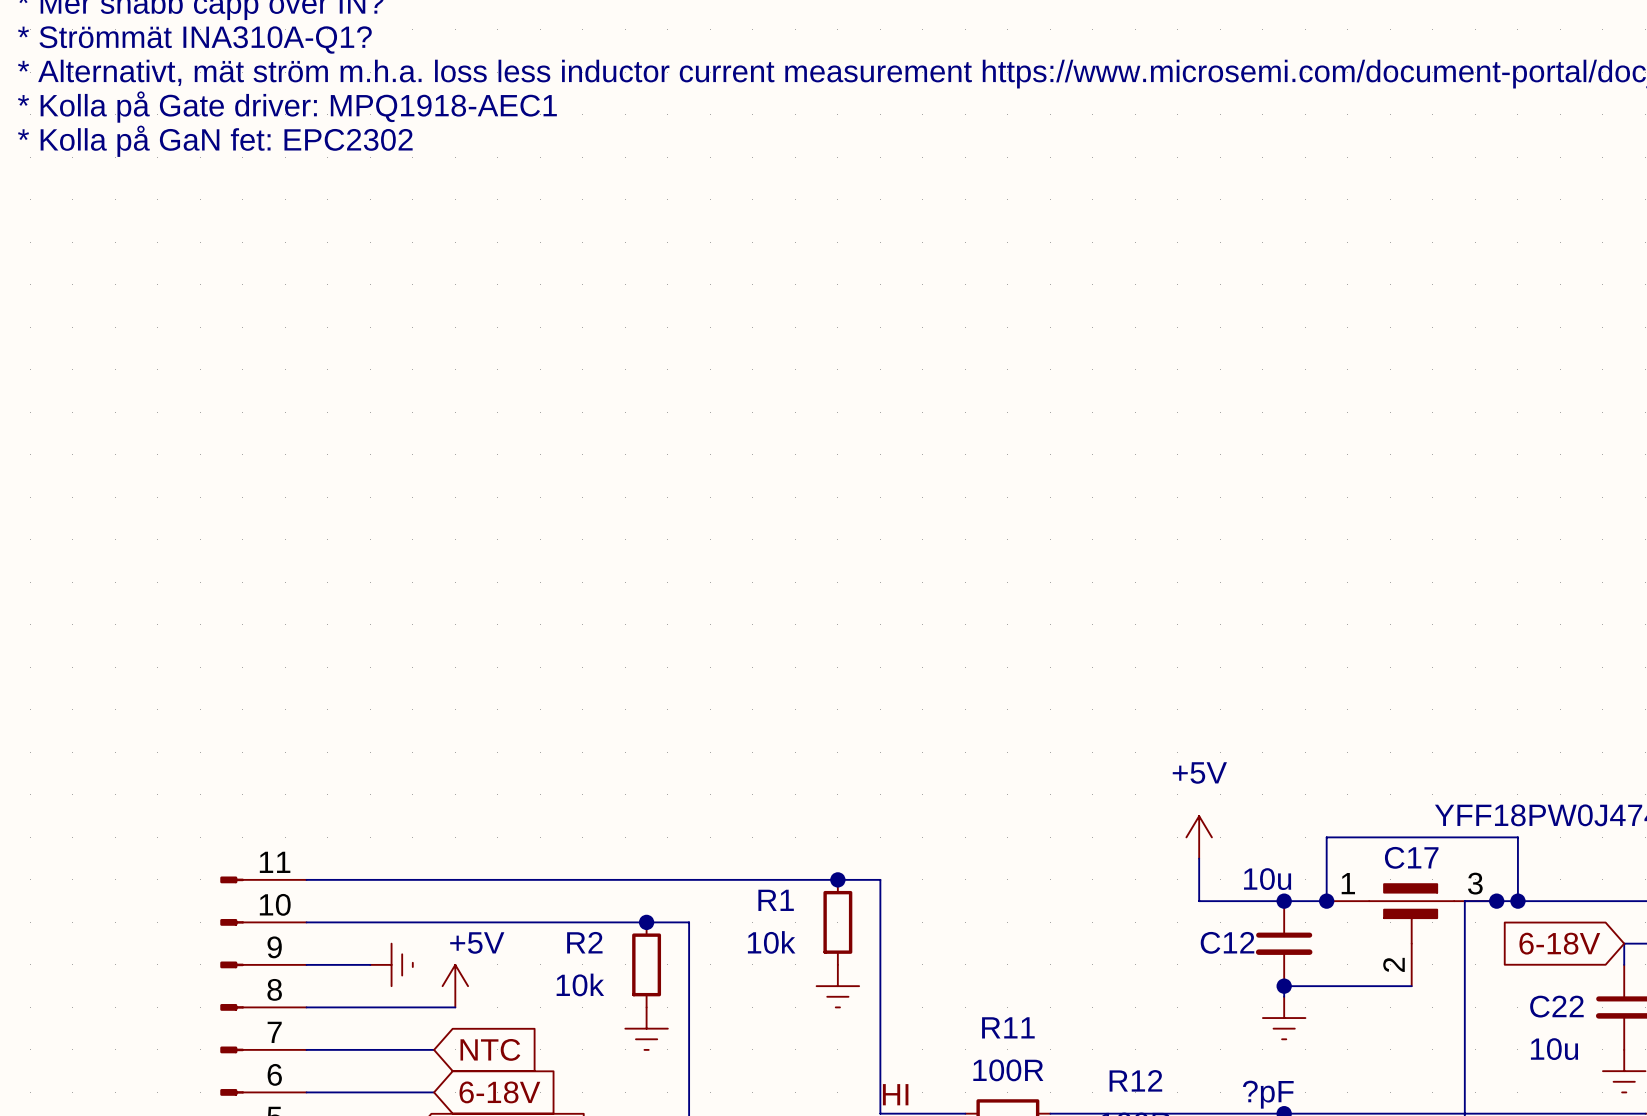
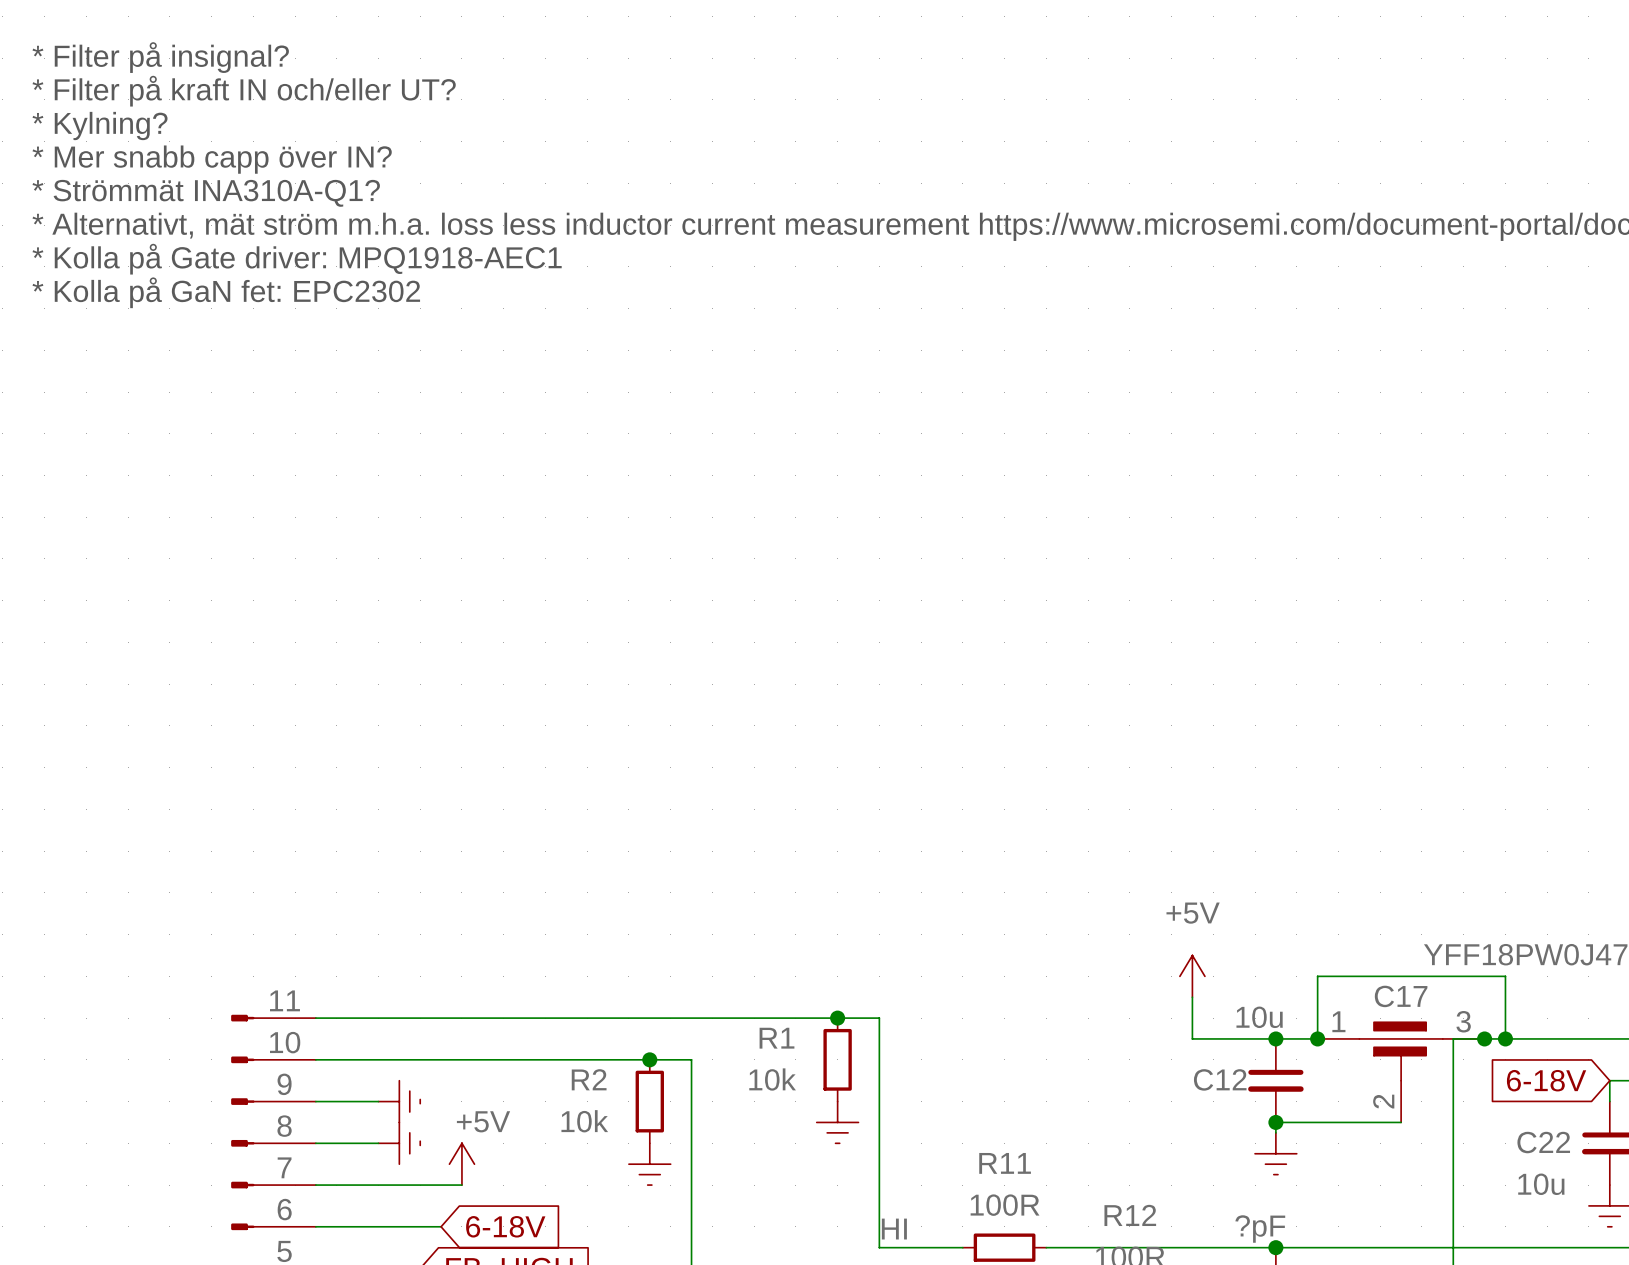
power symbol position: +5V (455, 986) -> +5V (461, 1164)
wire: (370, 1007) (455, 1007) -> none
power symbol: none -> (399, 1143)
wire: none -> (441, 1185) (461, 1185)
global label: NTC (490, 1049) -> none

